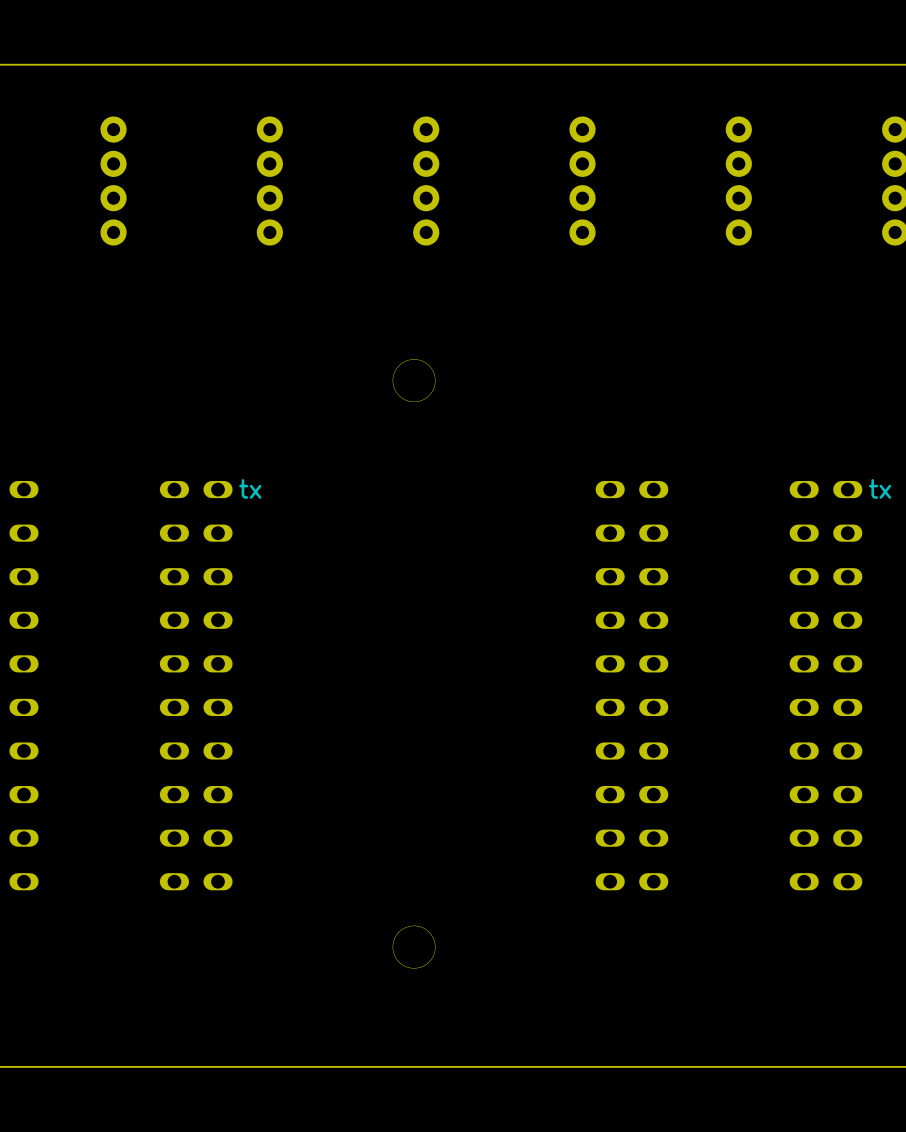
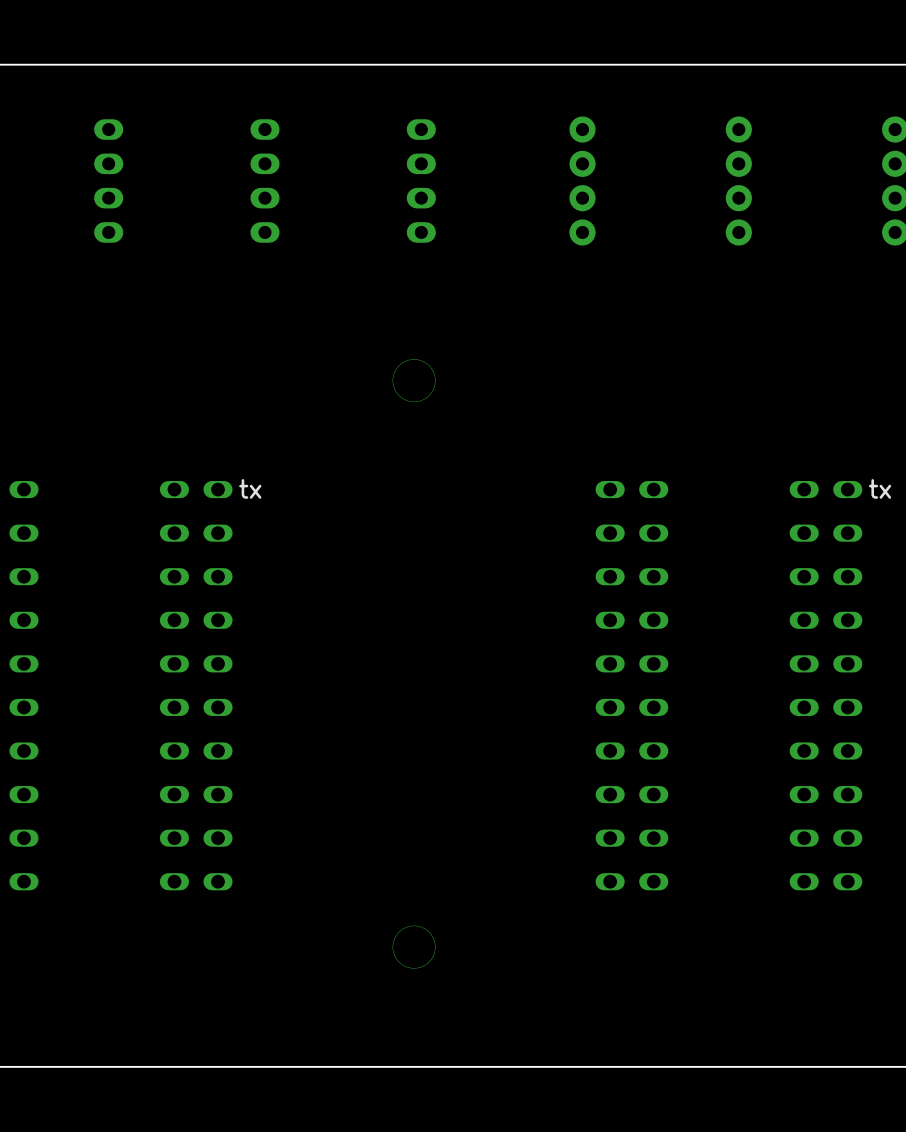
part footprint: [100, 116, 127, 246] -> [94, 119, 124, 243]
part footprint: [256, 116, 283, 246] -> [250, 119, 280, 243]
part footprint: [413, 116, 440, 246] -> [406, 119, 436, 243]

